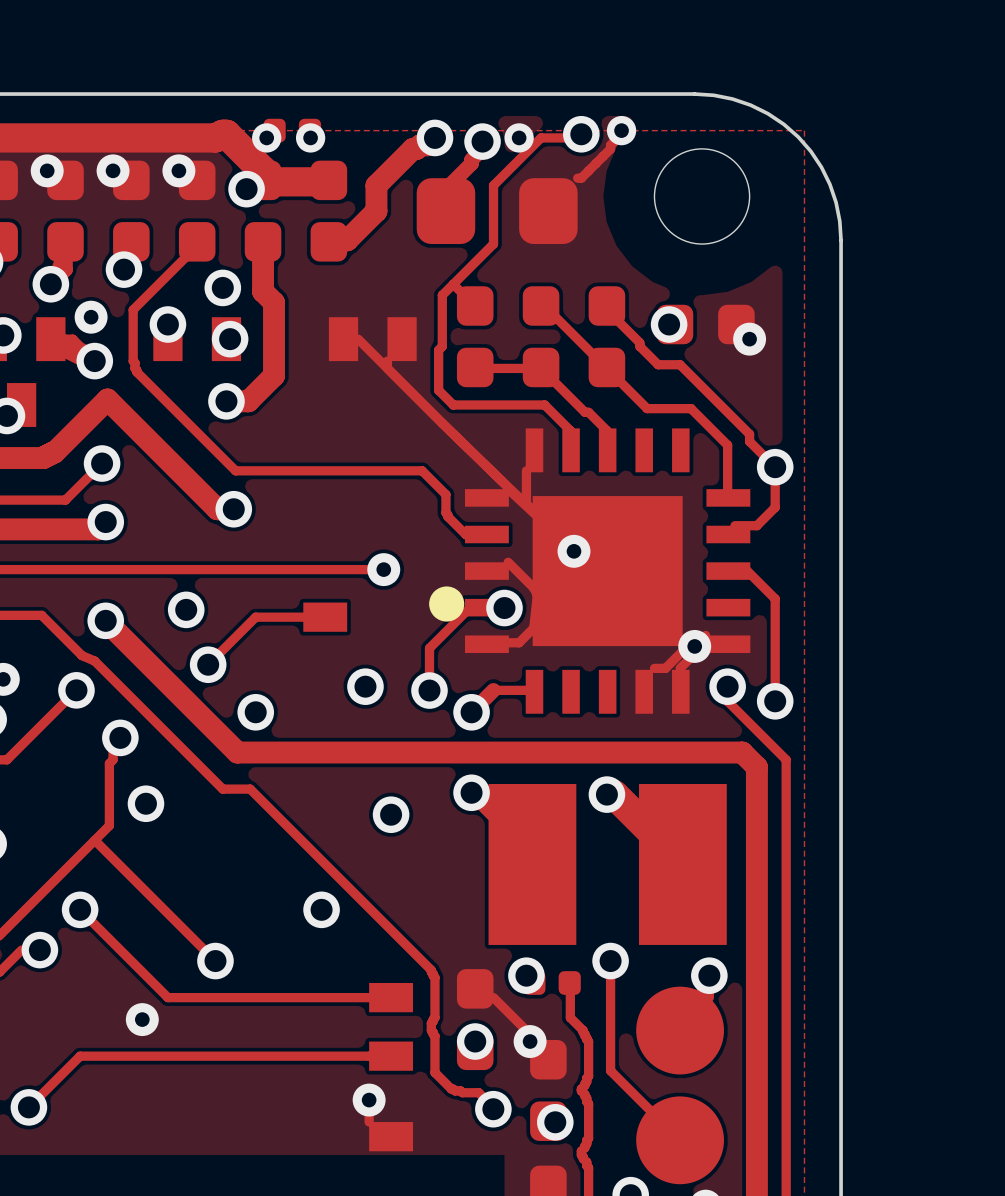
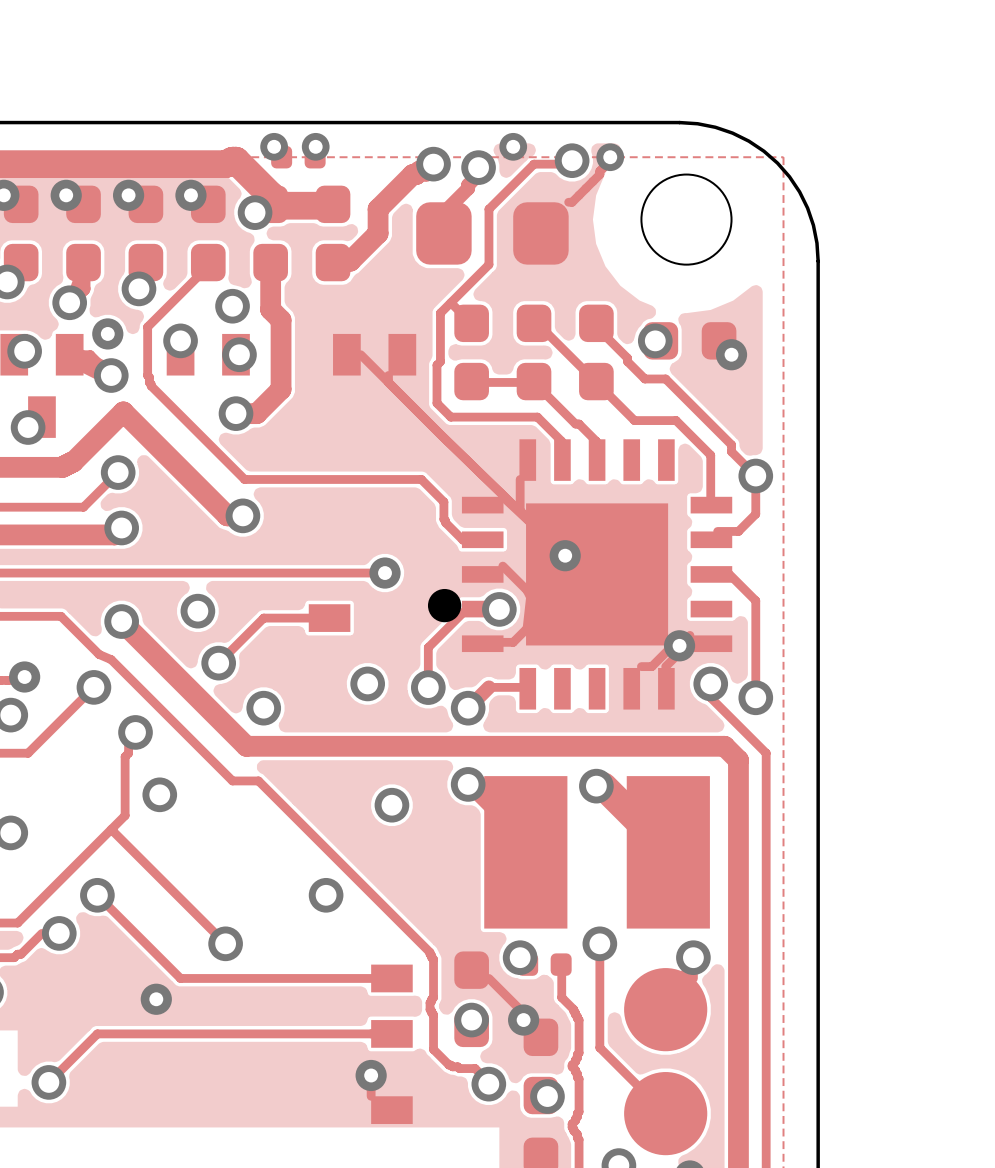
via position: (266, 137) -> (274, 146)
via position: (310, 137) -> (315, 146)
via position: (519, 137) -> (513, 146)

